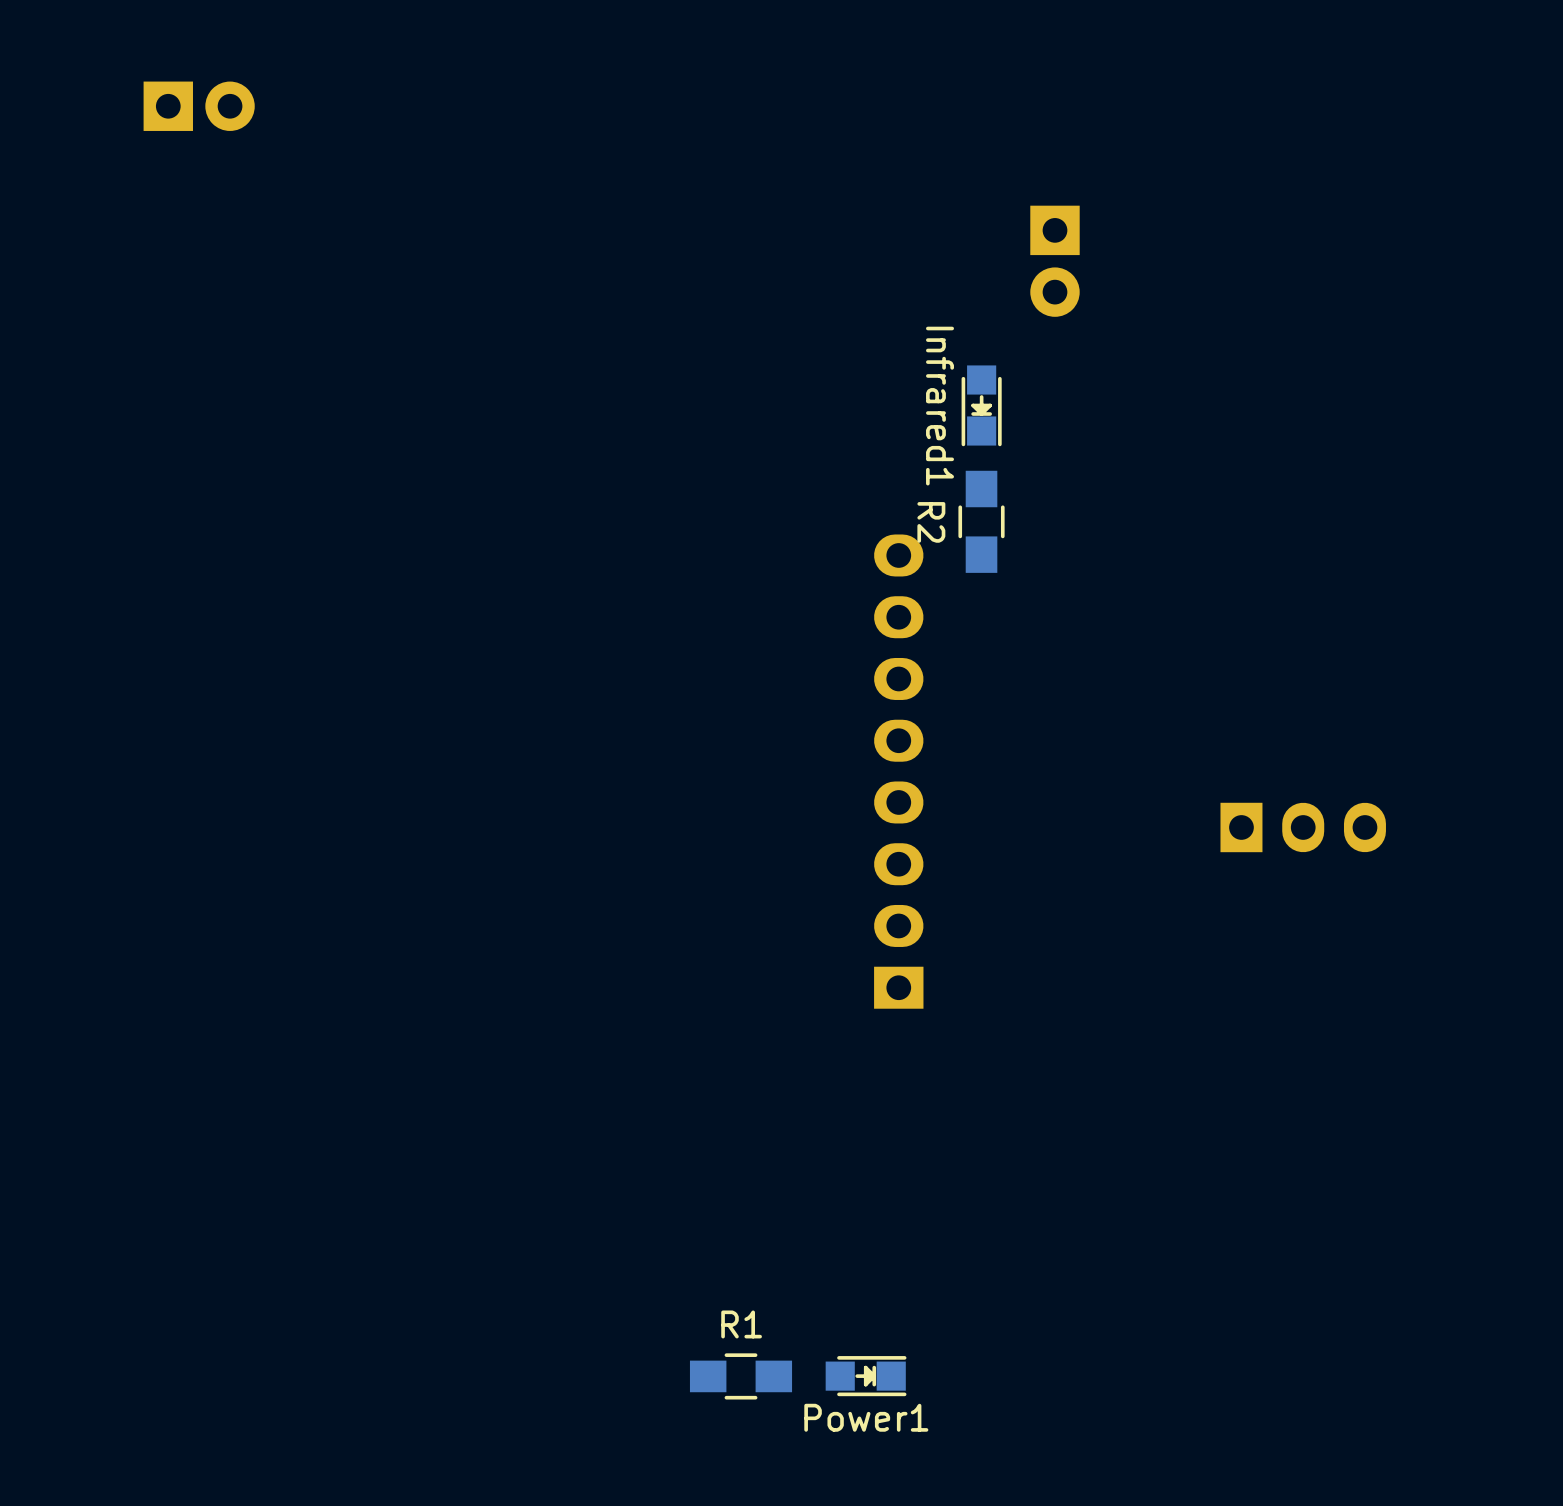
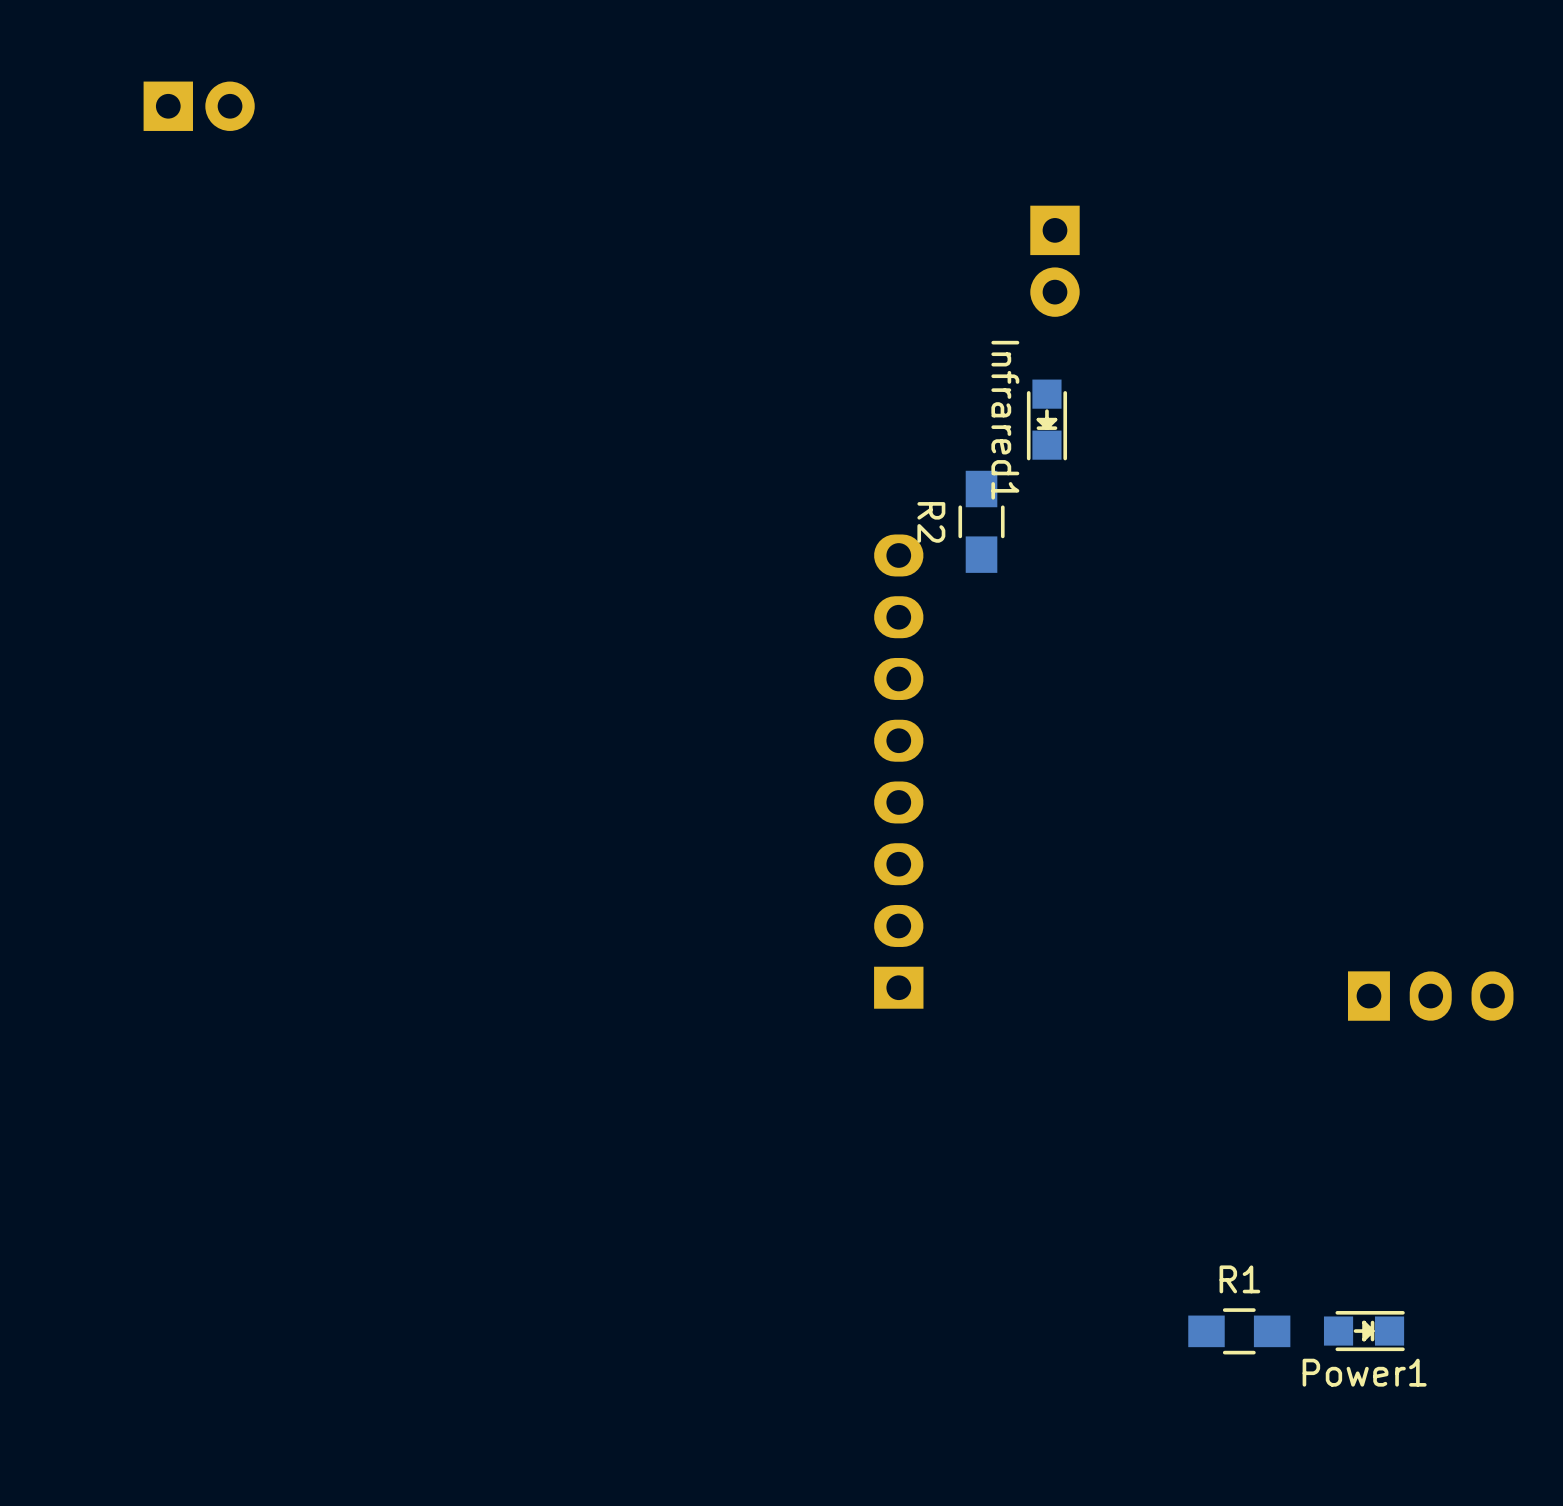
Infrared1 position: (981, 405) -> (1046, 419)
part position: (1303, 827) -> (1430, 996)
R1 position: (741, 1376) -> (1239, 1331)
Power1 position: (866, 1376) -> (1364, 1331)

